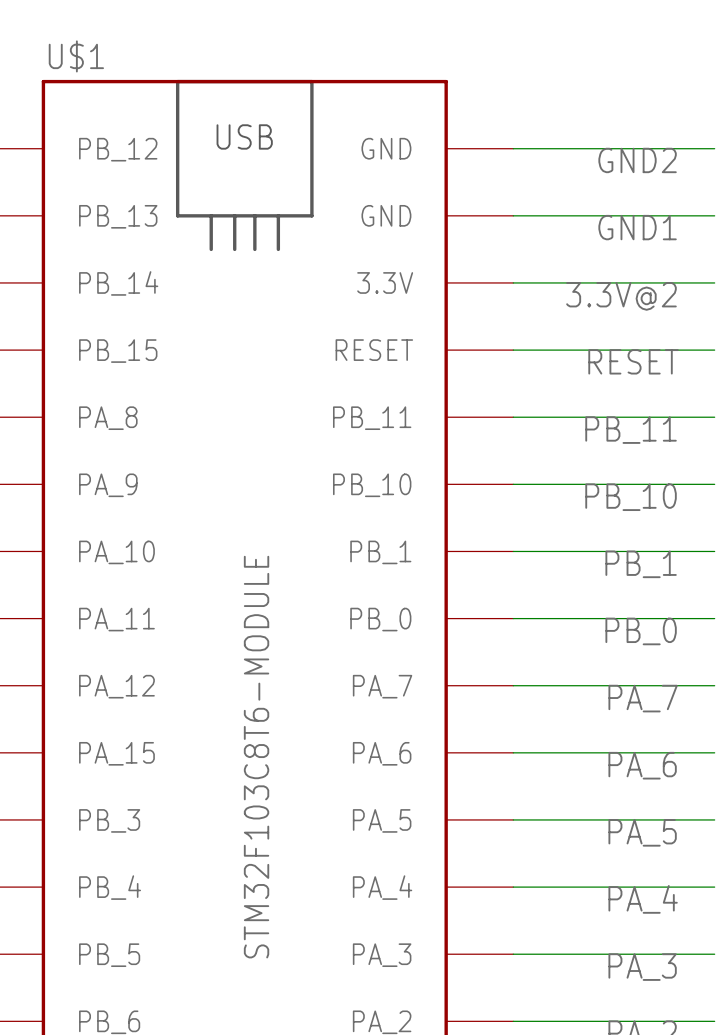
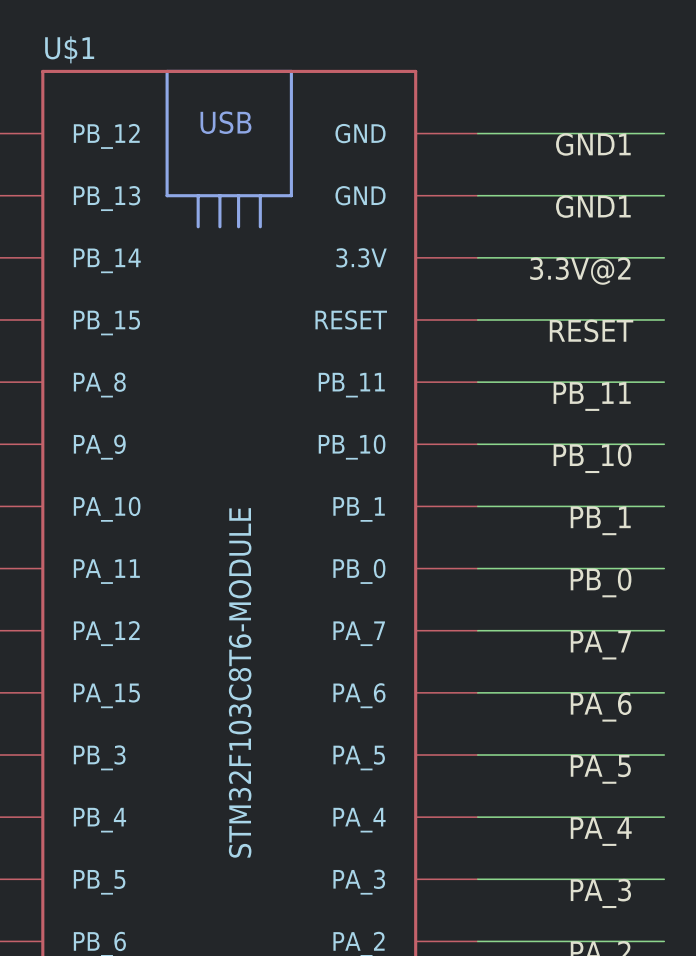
label: GND2 (637, 160) -> GND1 (593, 144)

